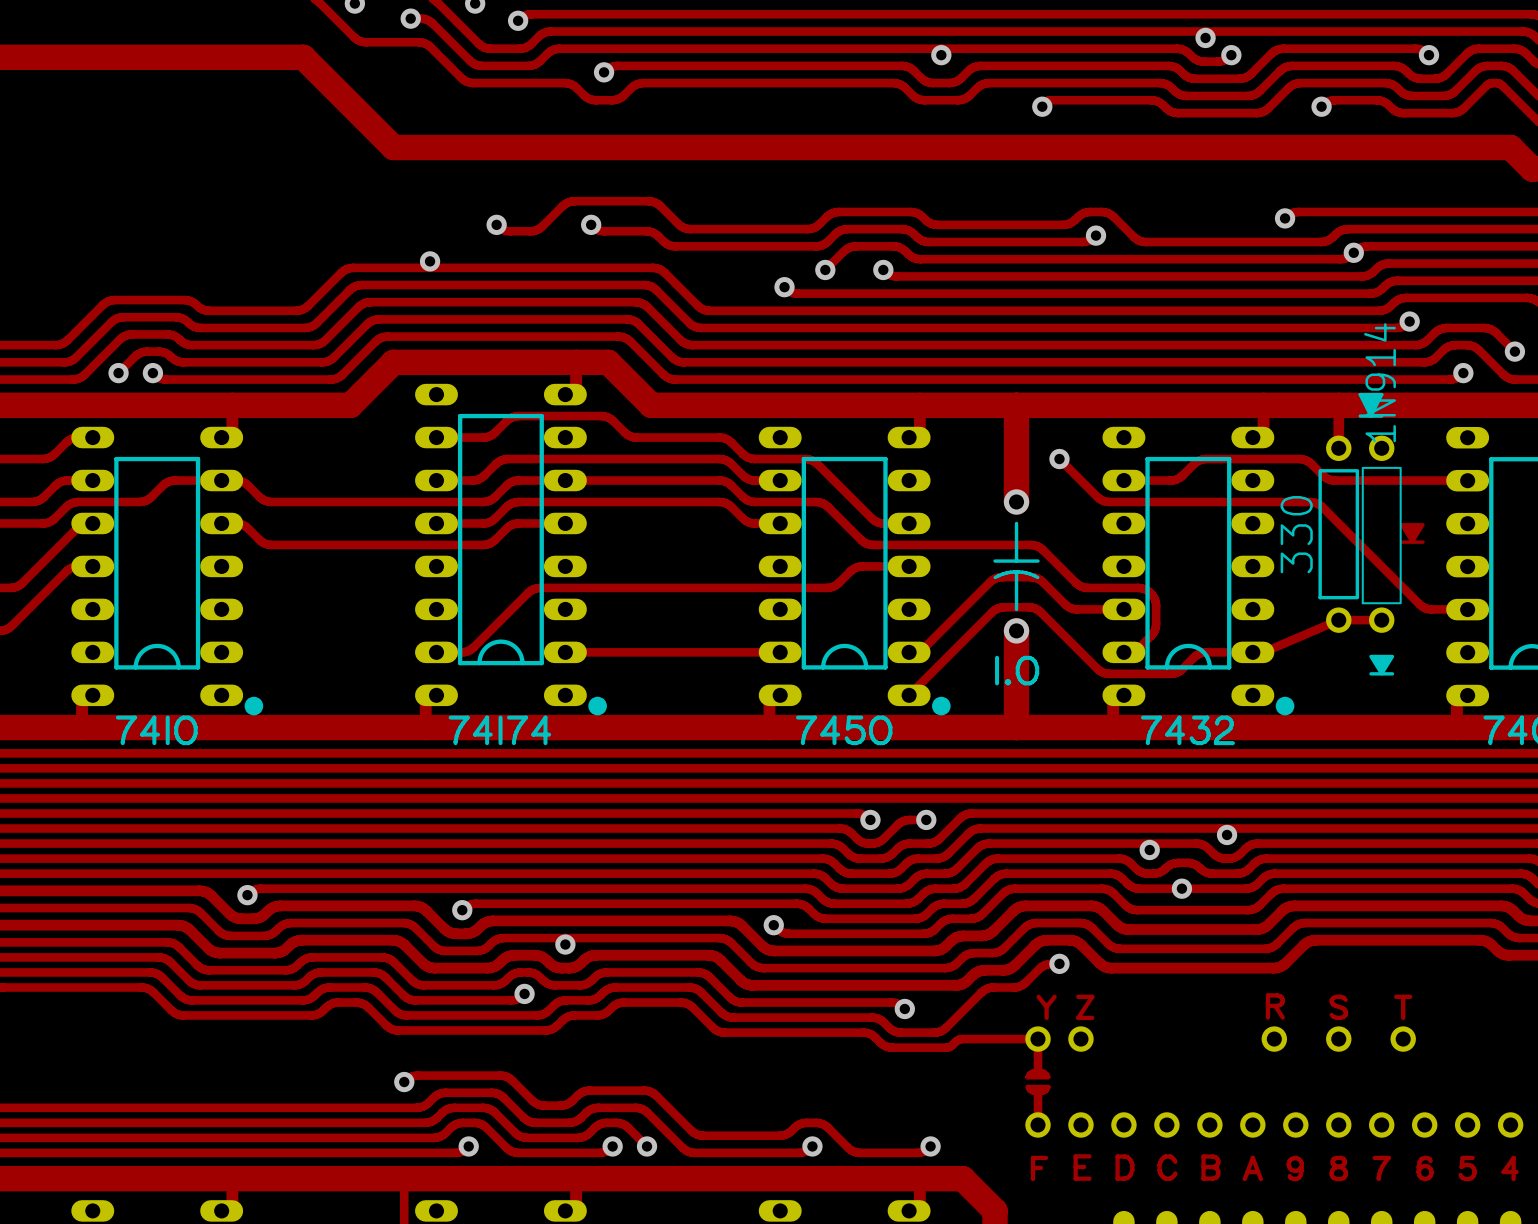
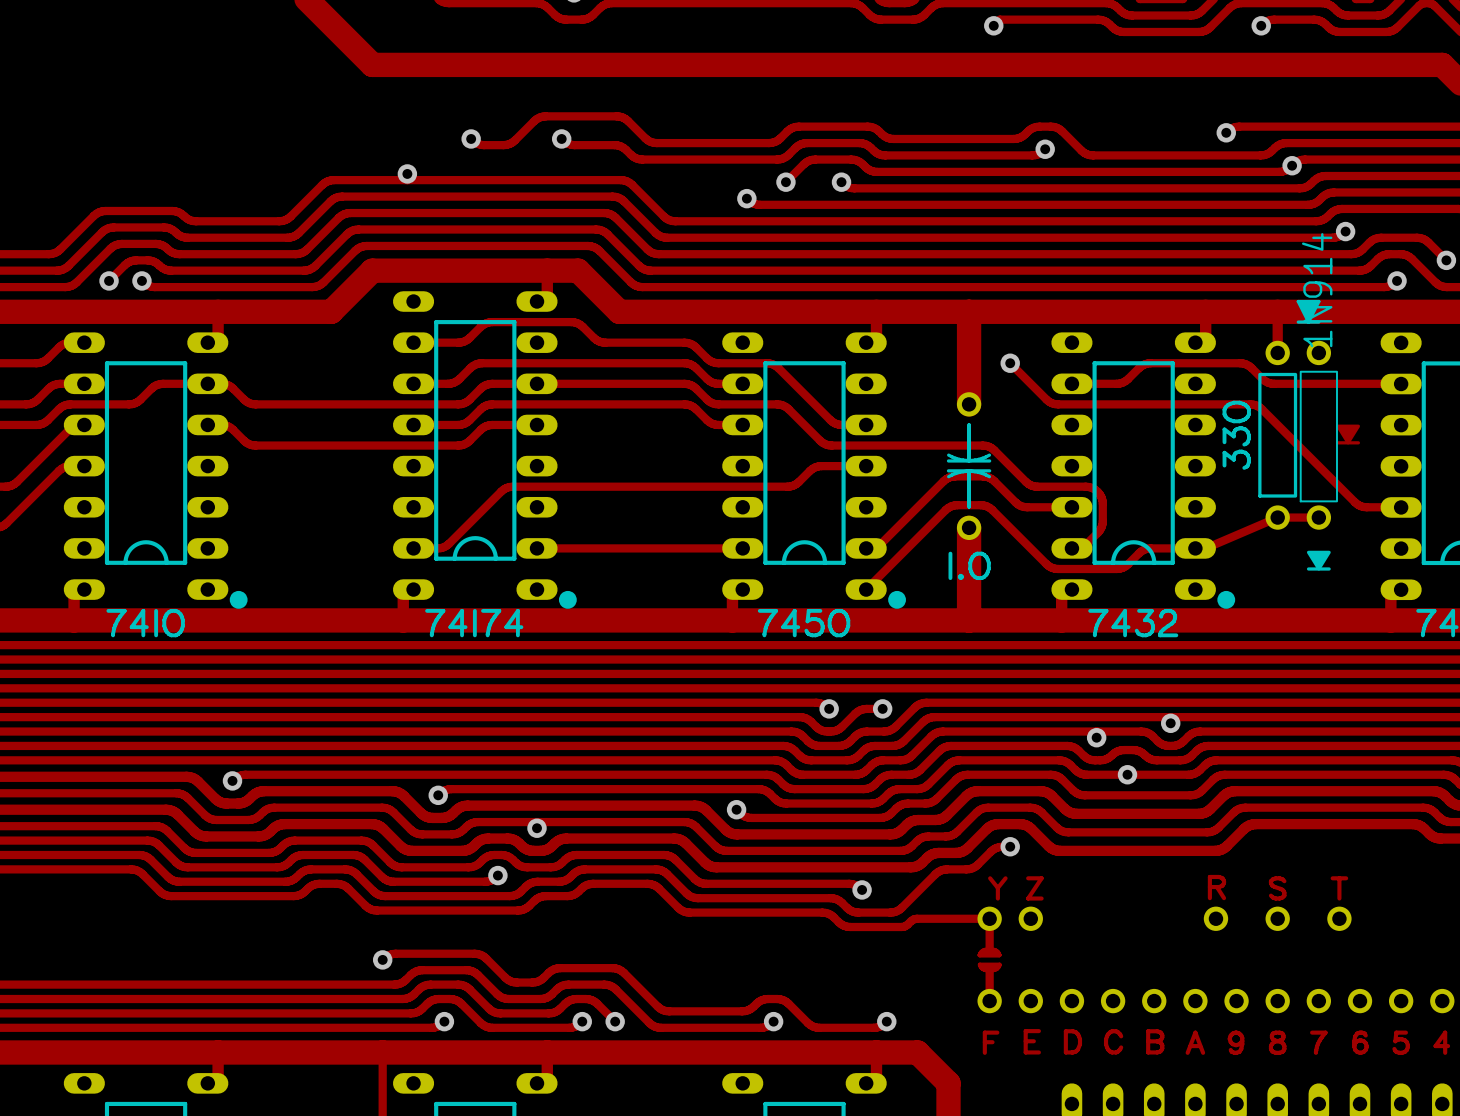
line: none -> (1233, 402) (1225, 407) (1225, 416) (1233, 421) (1245, 418) (1248, 414) (1247, 407) (1243, 403) (1233, 402)
via: (1016, 501) -> none
part value: 330 (1296, 534) -> none
line: none -> (1224, 442) (1224, 429) (1233, 436) (1234, 430) (1241, 428) (1245, 429) (1248, 435) (1247, 442) (1244, 444)
line: none -> (1224, 465) (1224, 452) (1233, 459) (1234, 453) (1241, 451) (1245, 452) (1248, 458) (1247, 465) (1244, 467)
part: none -> (969, 466)
via: (1016, 630) -> none

